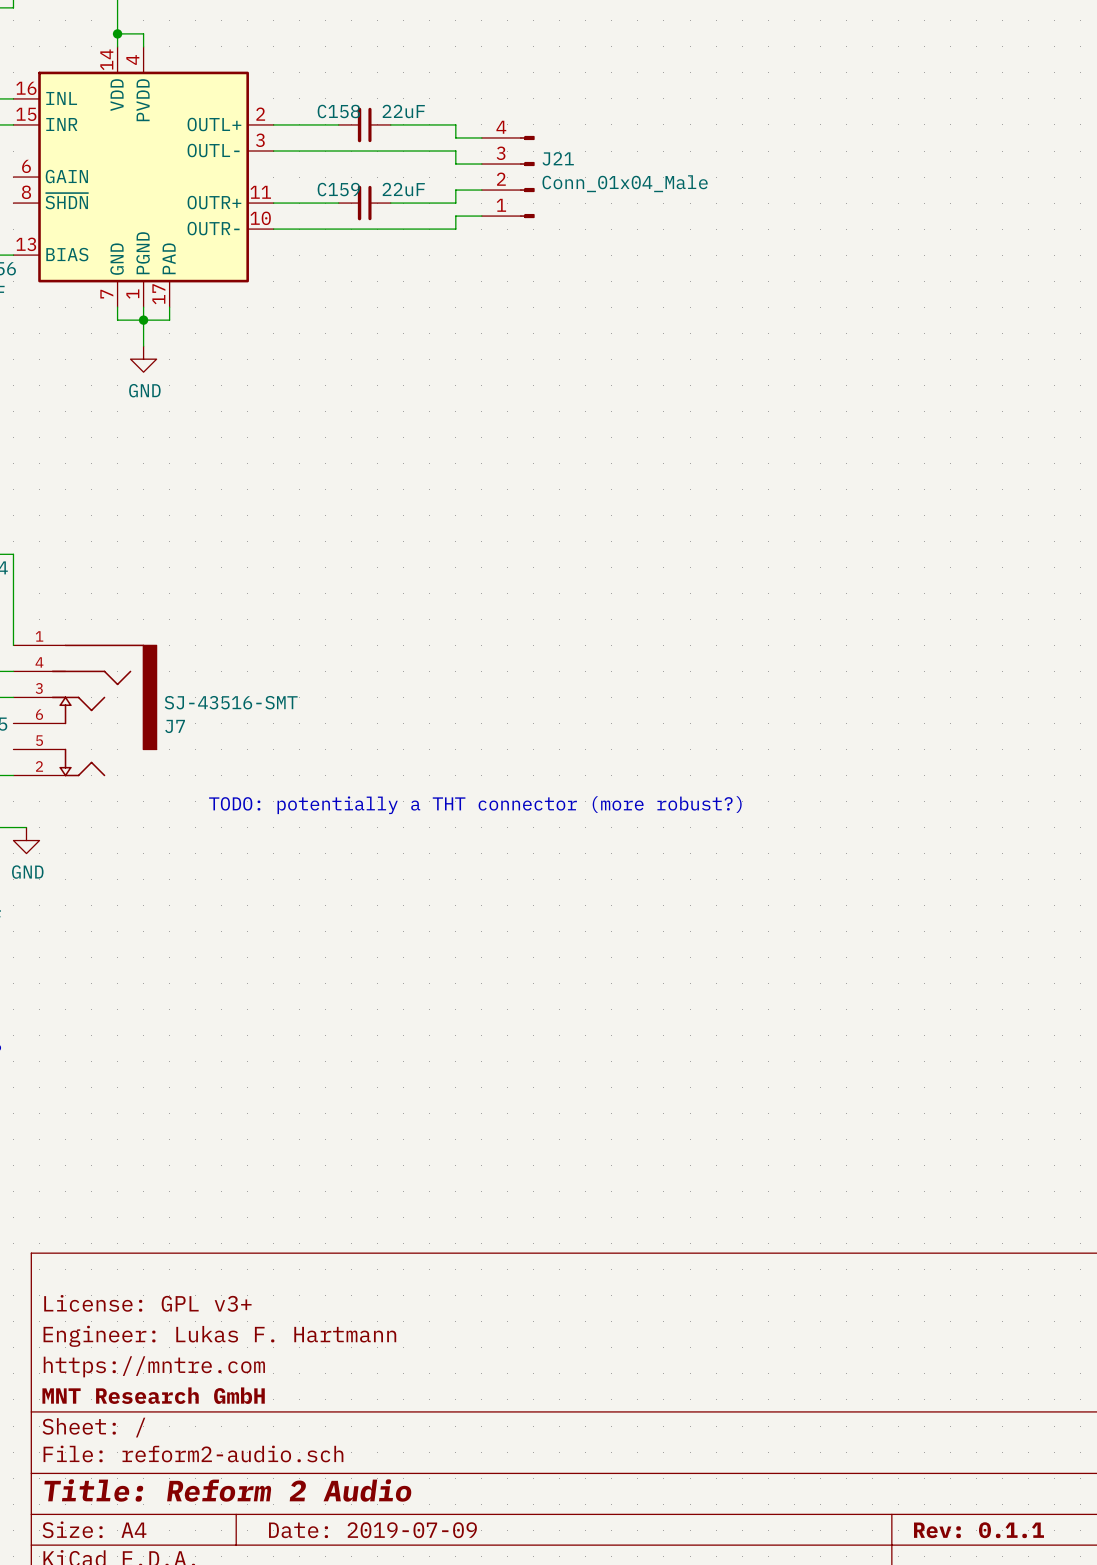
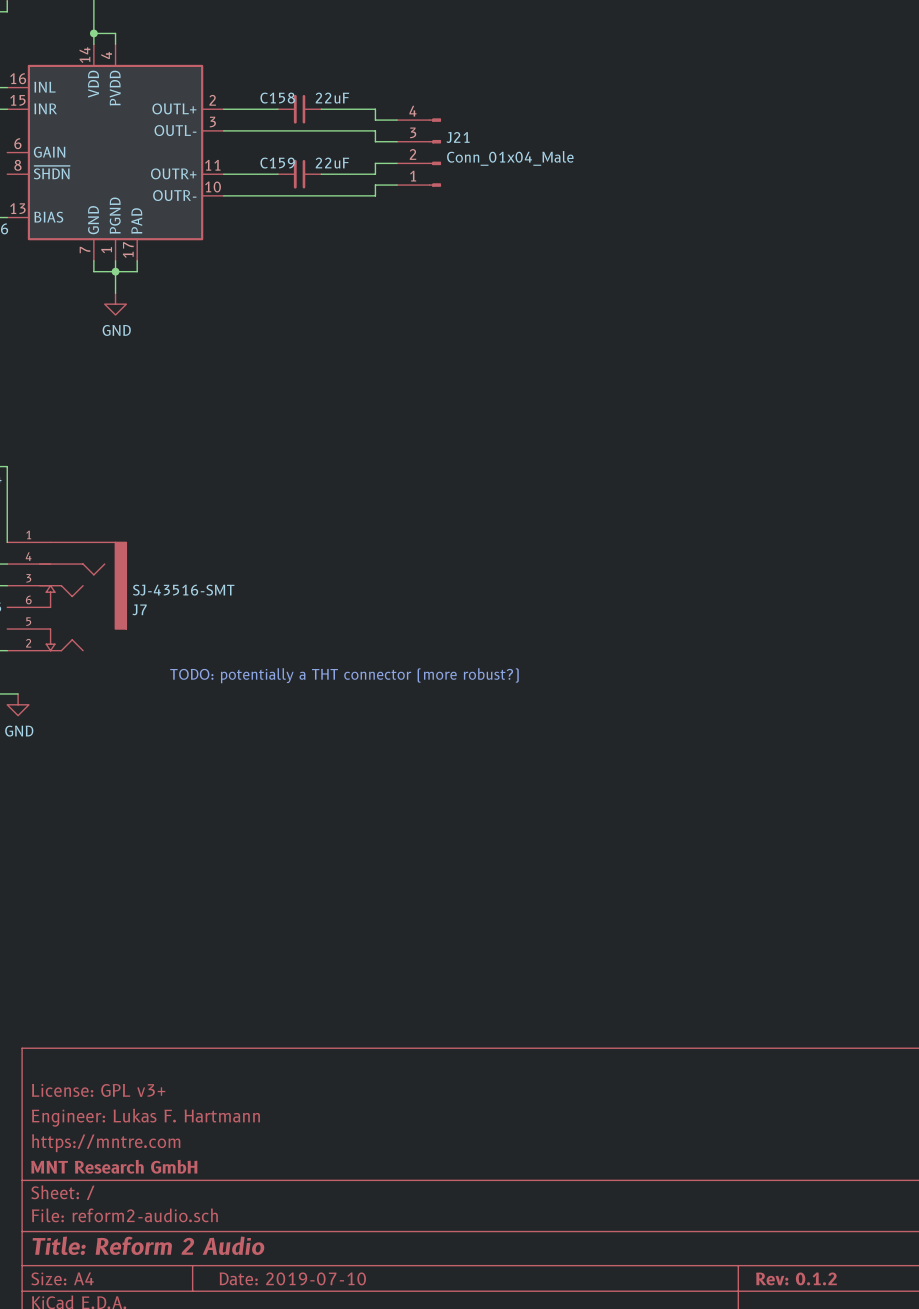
title block: Date: 2019-07-09 (372, 1530) -> Date: 2019-07-10 (292, 1278)
title block: Rev: 0.1.1 (979, 1530) -> Rev: 0.1.2 (796, 1278)

